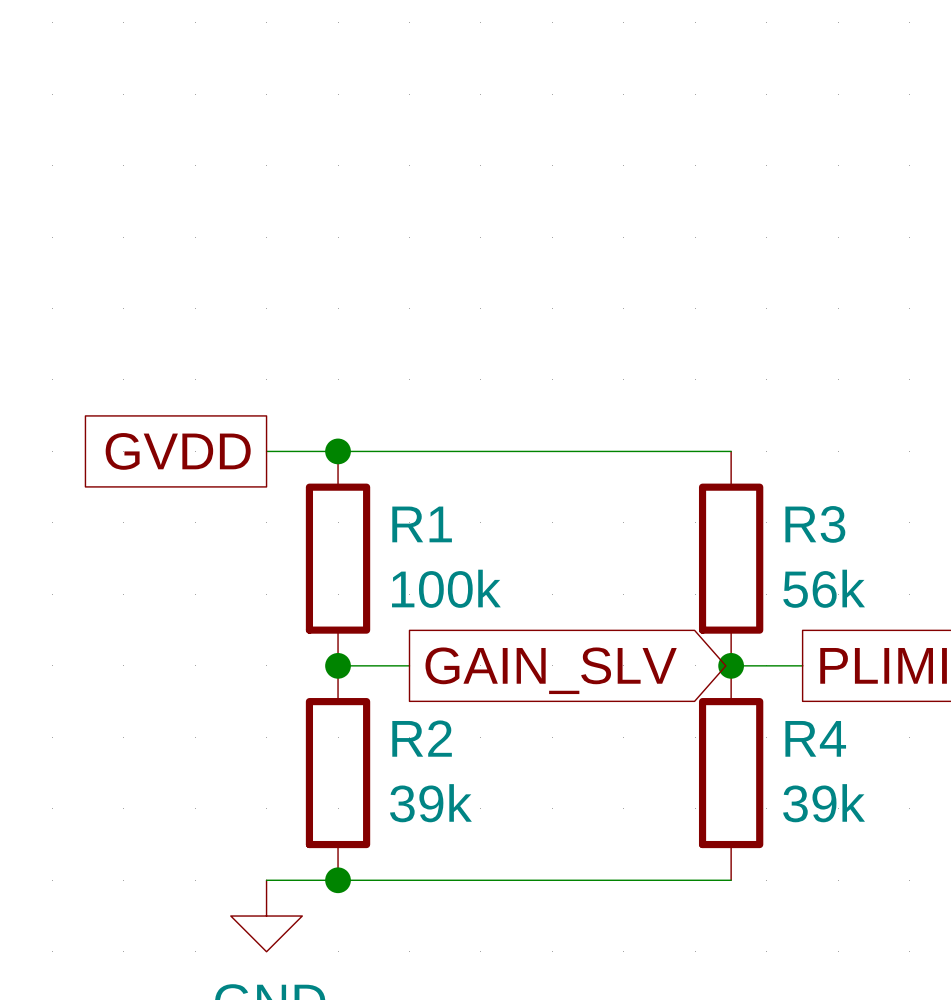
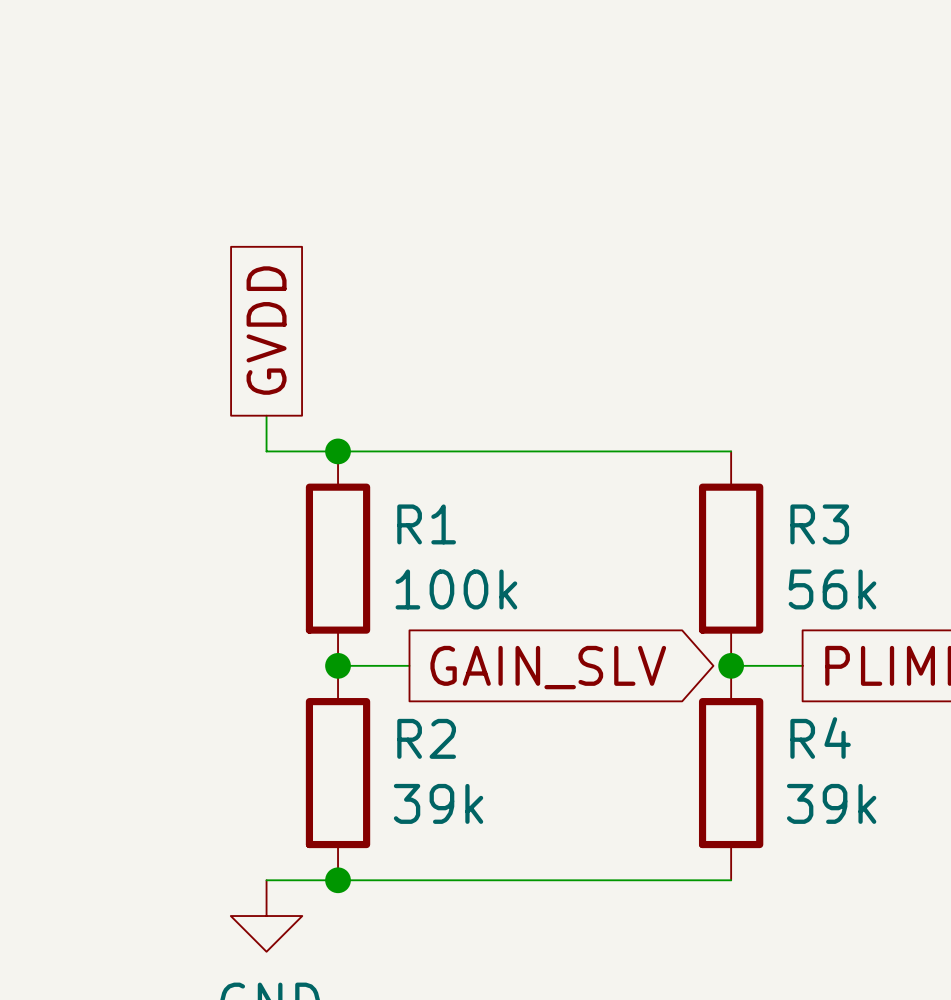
global label rotation: 0° (178, 451) -> 90° clockwise (266, 330)

